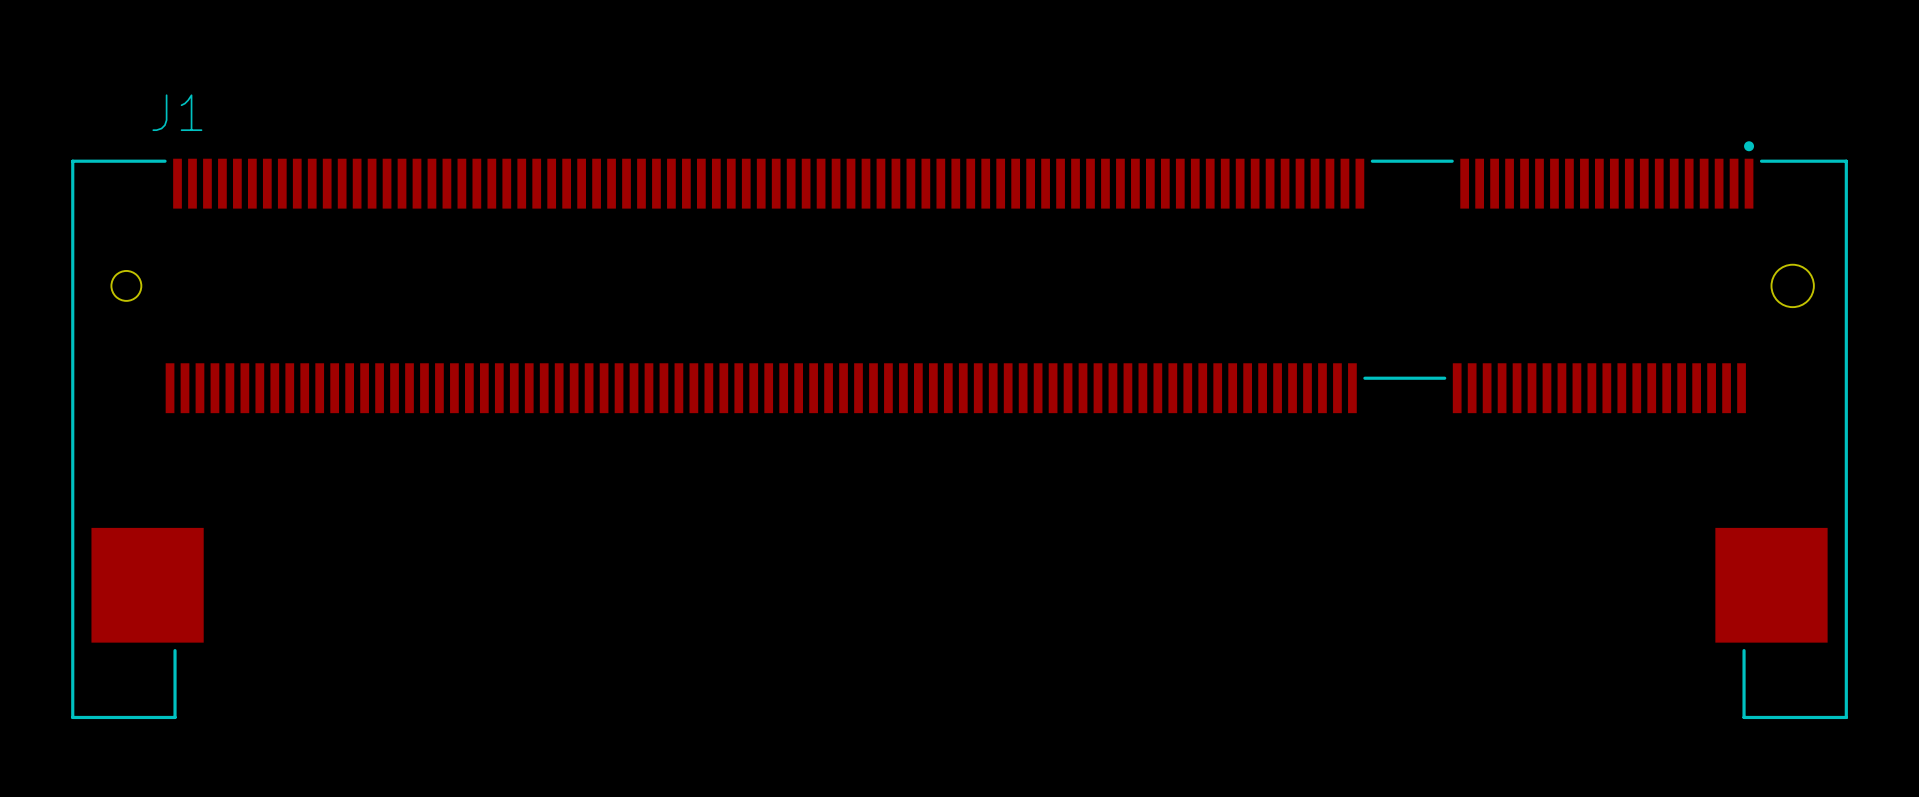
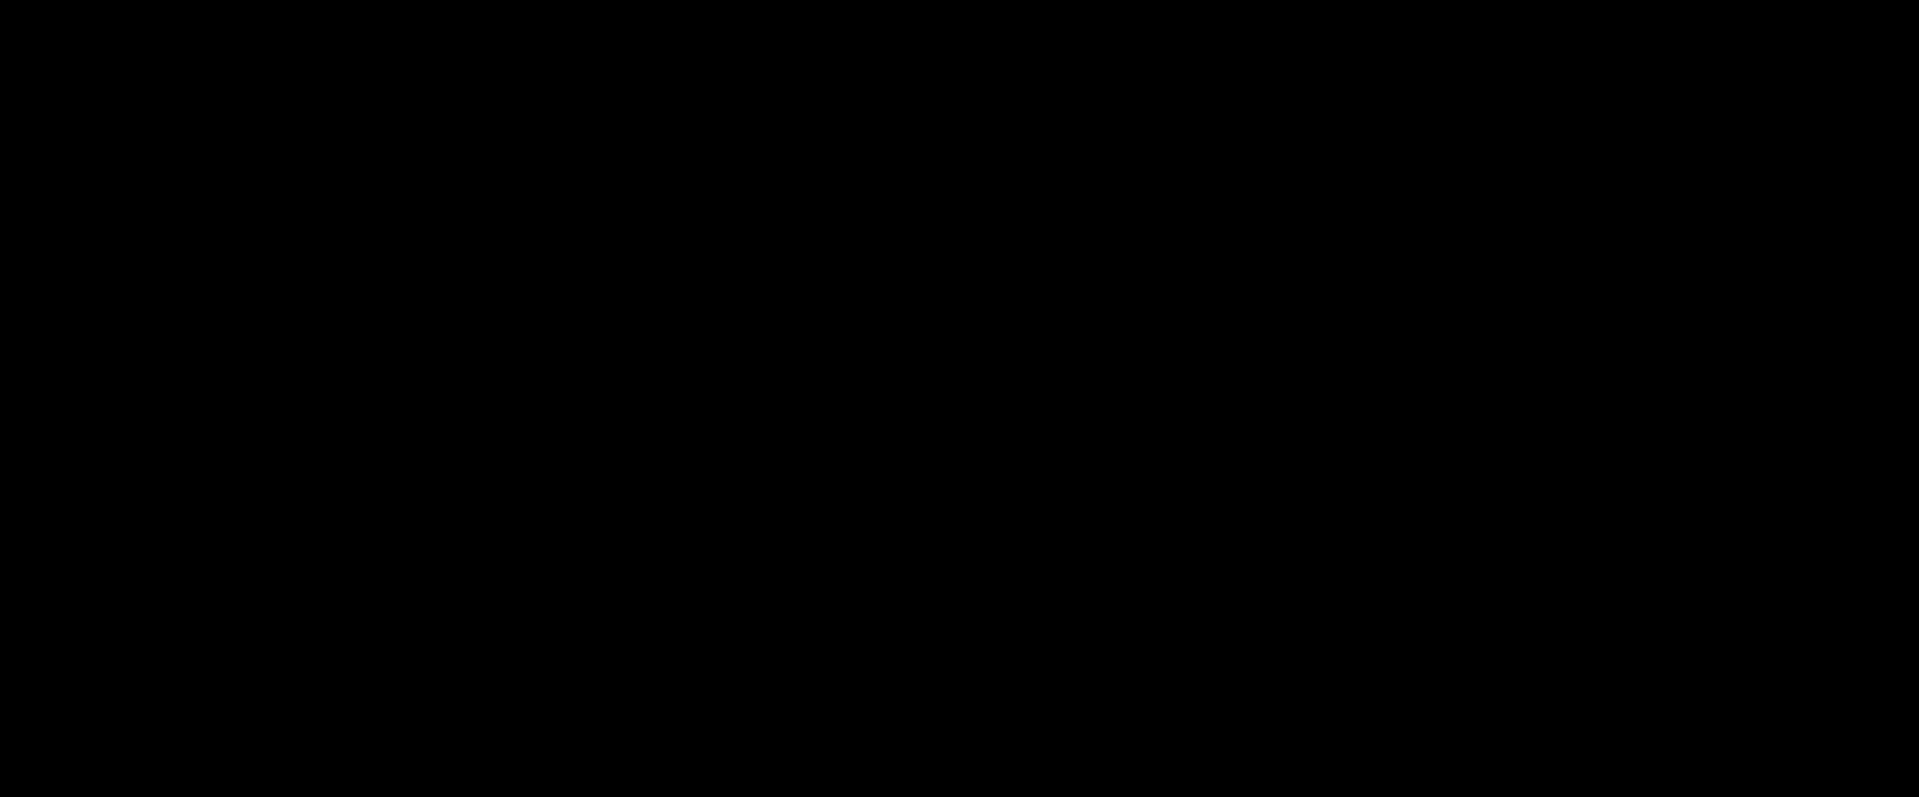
J1: (959, 430) -> none

